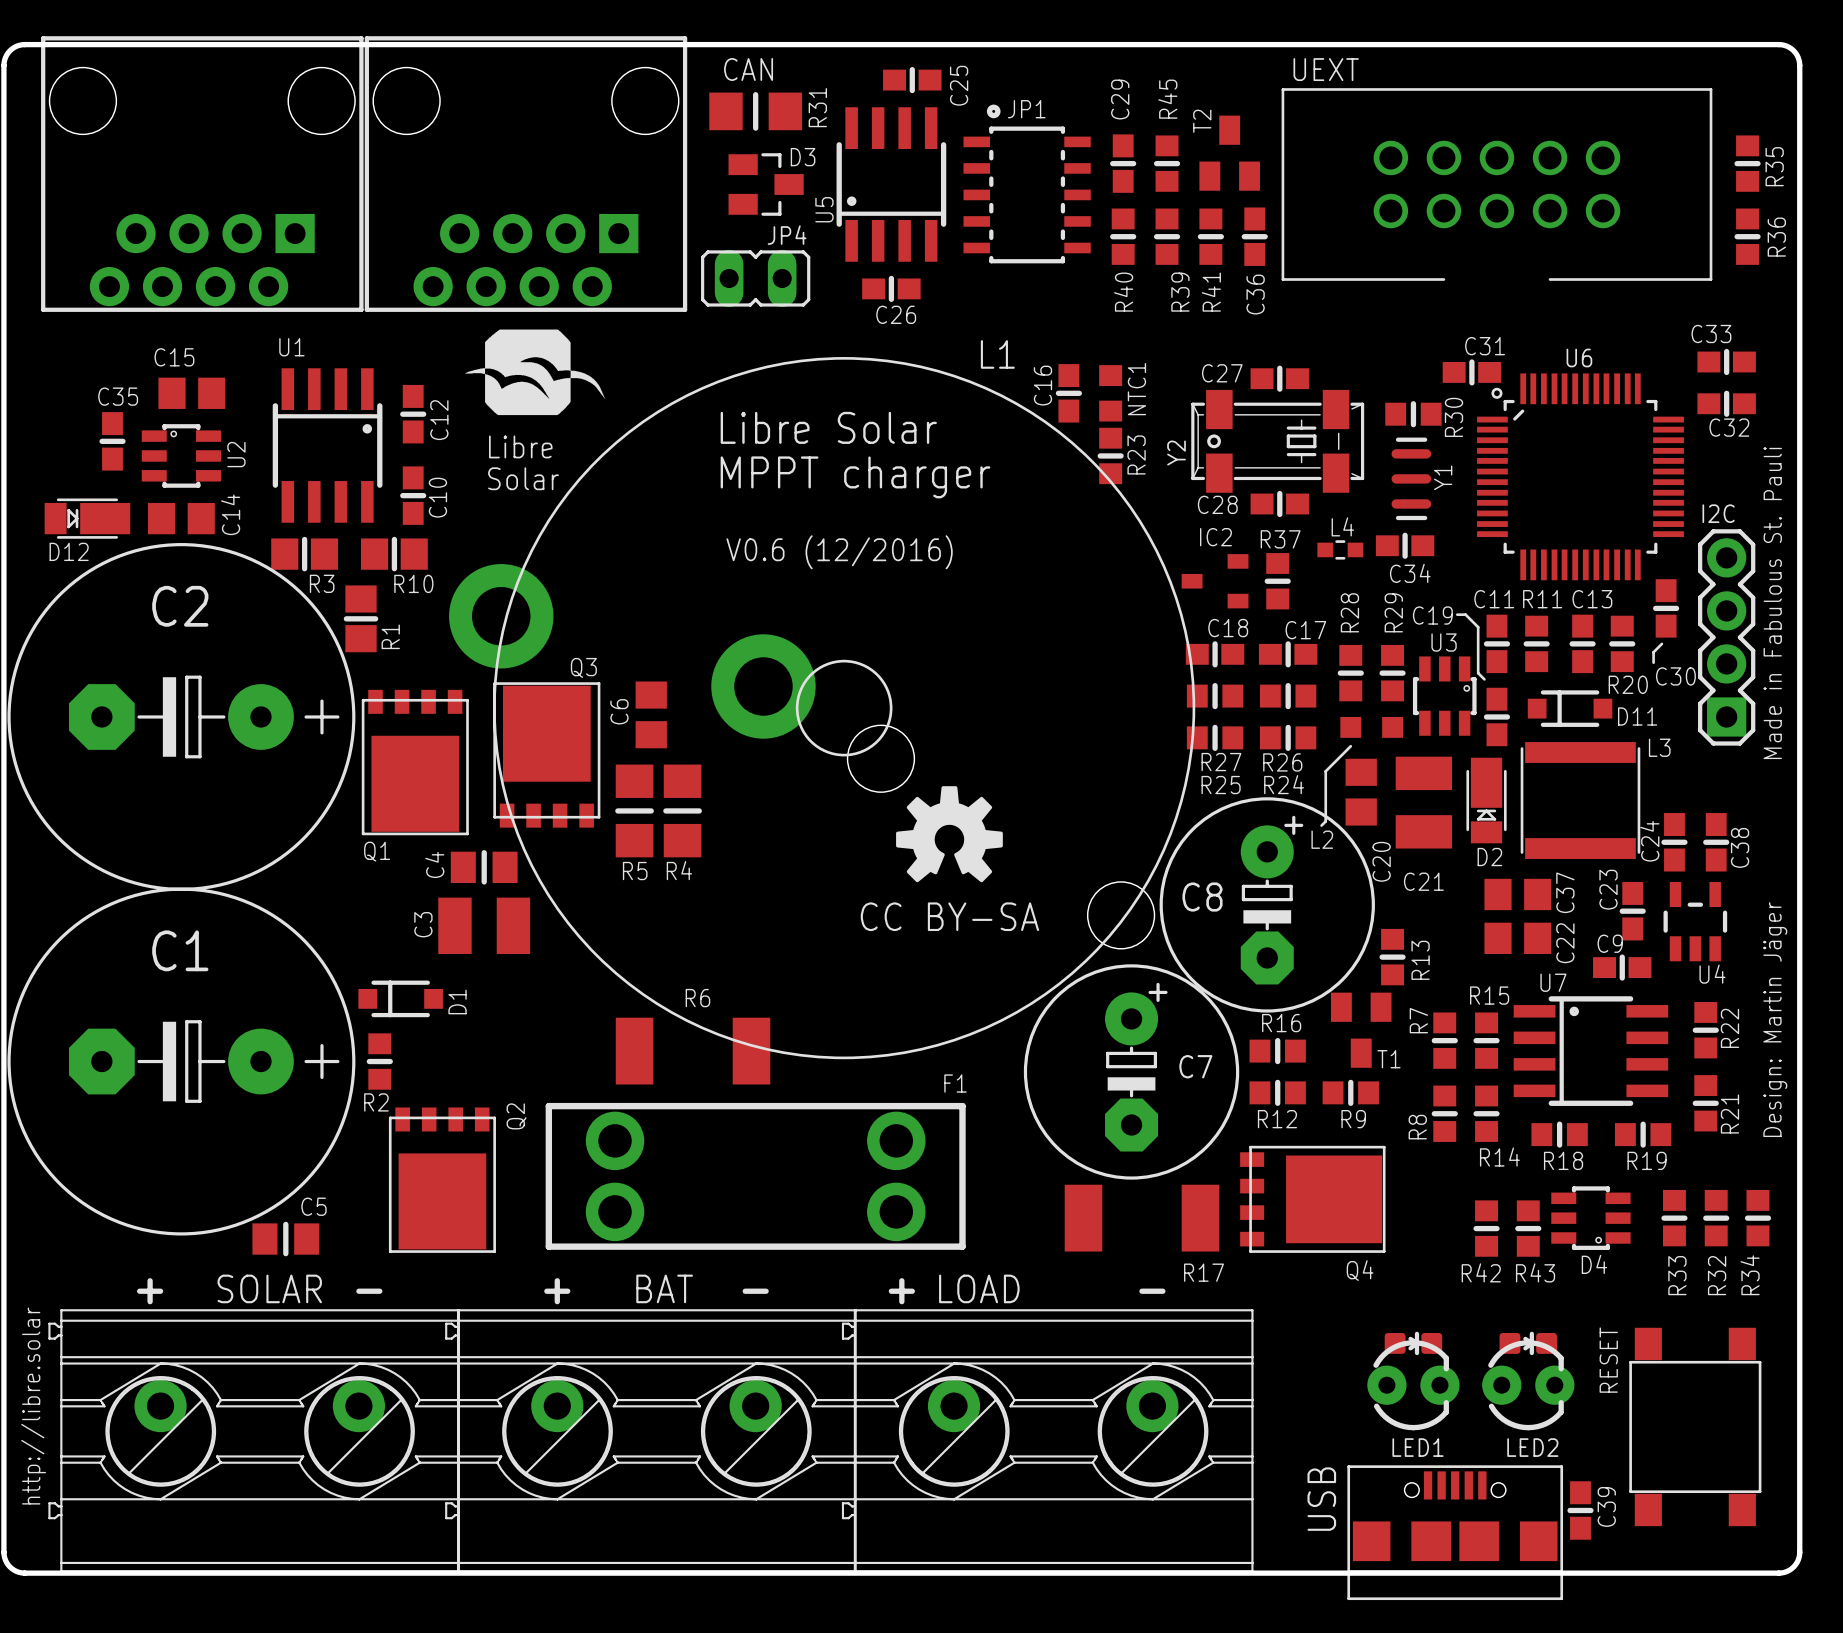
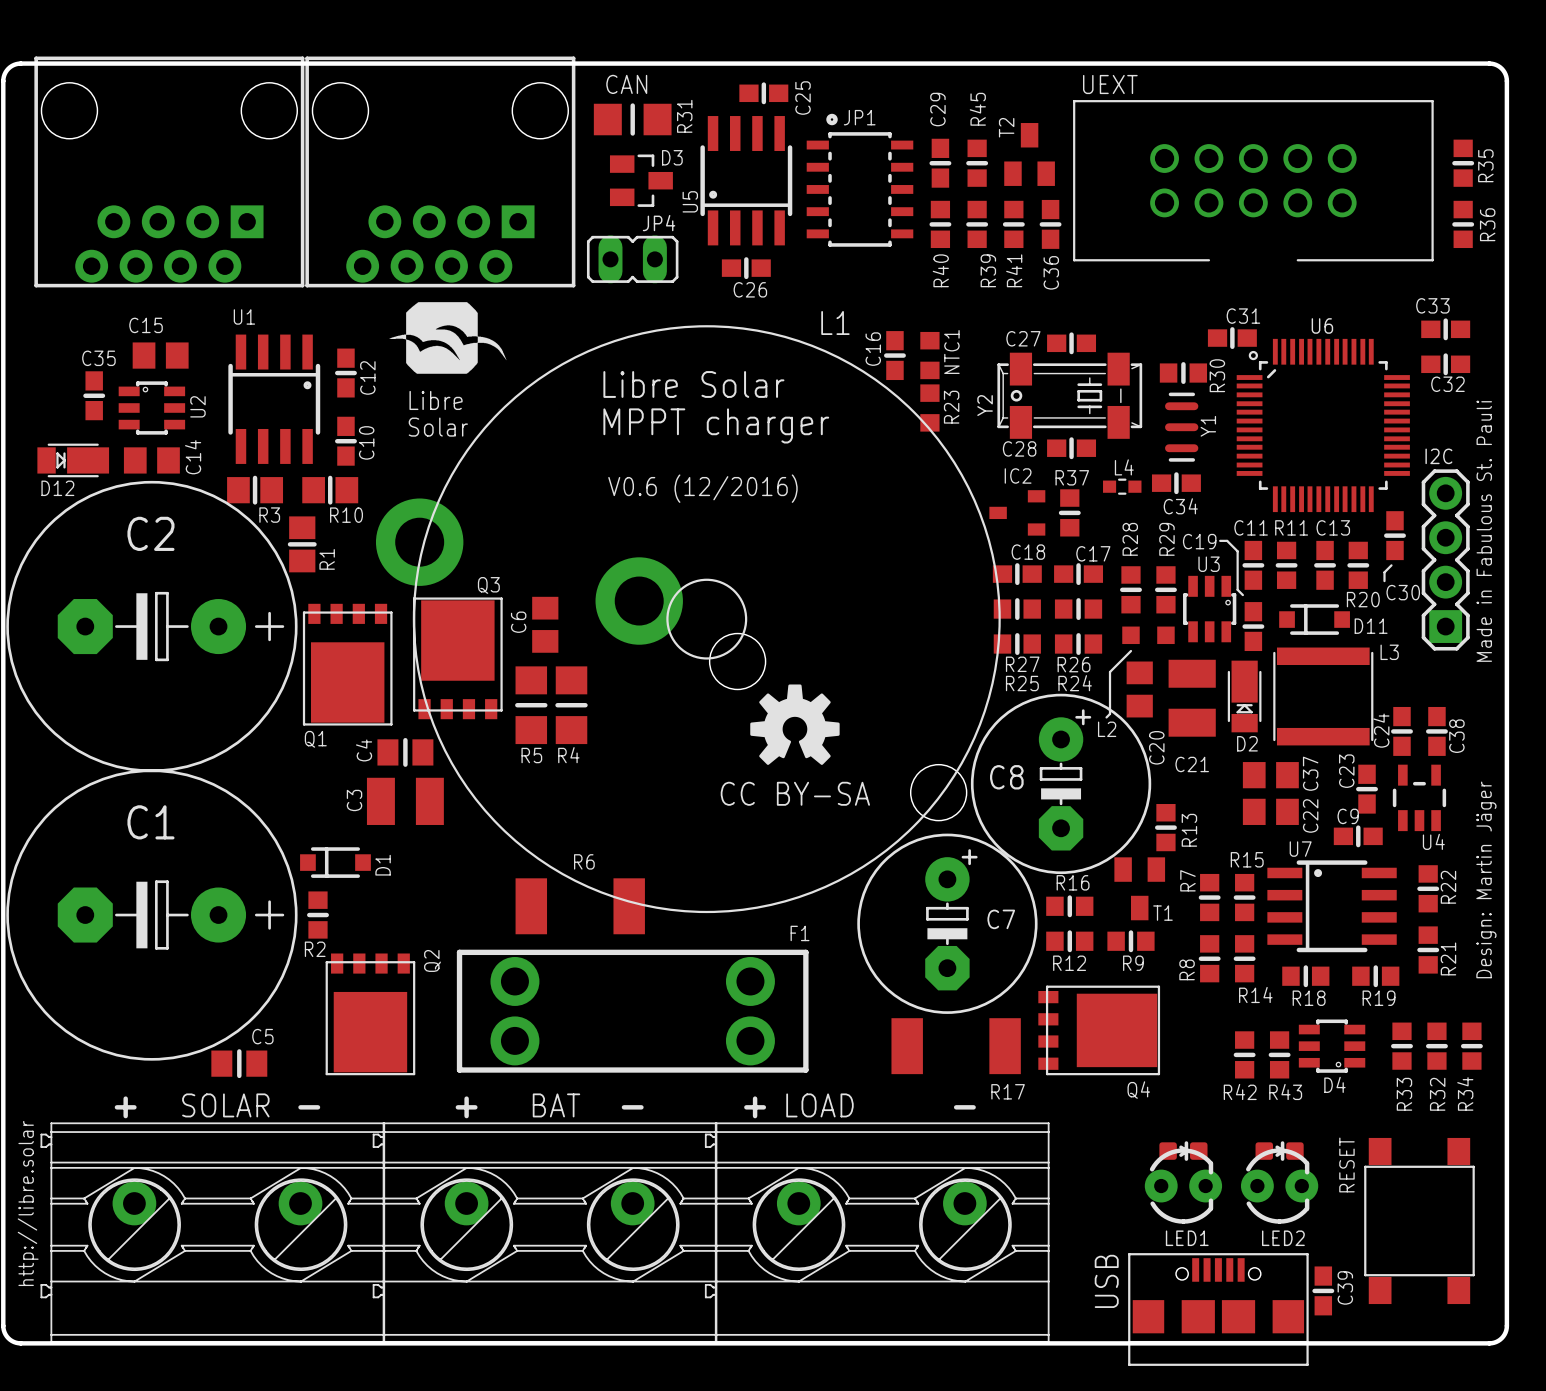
R23 footprint: [1097, 427, 1124, 485] -> [920, 384, 940, 432]

